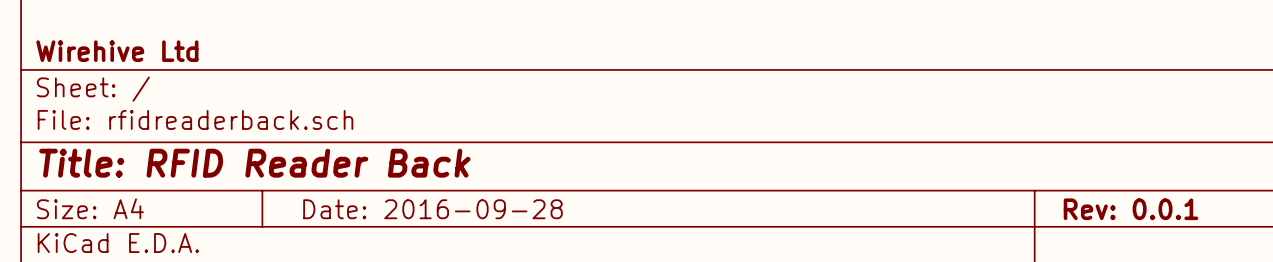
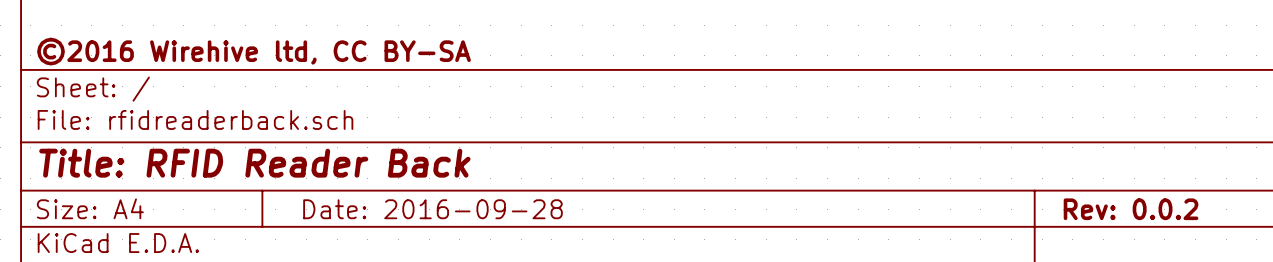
title block: Wirehive Ltd (117, 51) -> ©2016 Wirehive ltd, CC BY-SA (254, 51)
title block: Rev: 0.0.1 (1131, 209) -> Rev: 0.0.2 (1131, 209)

